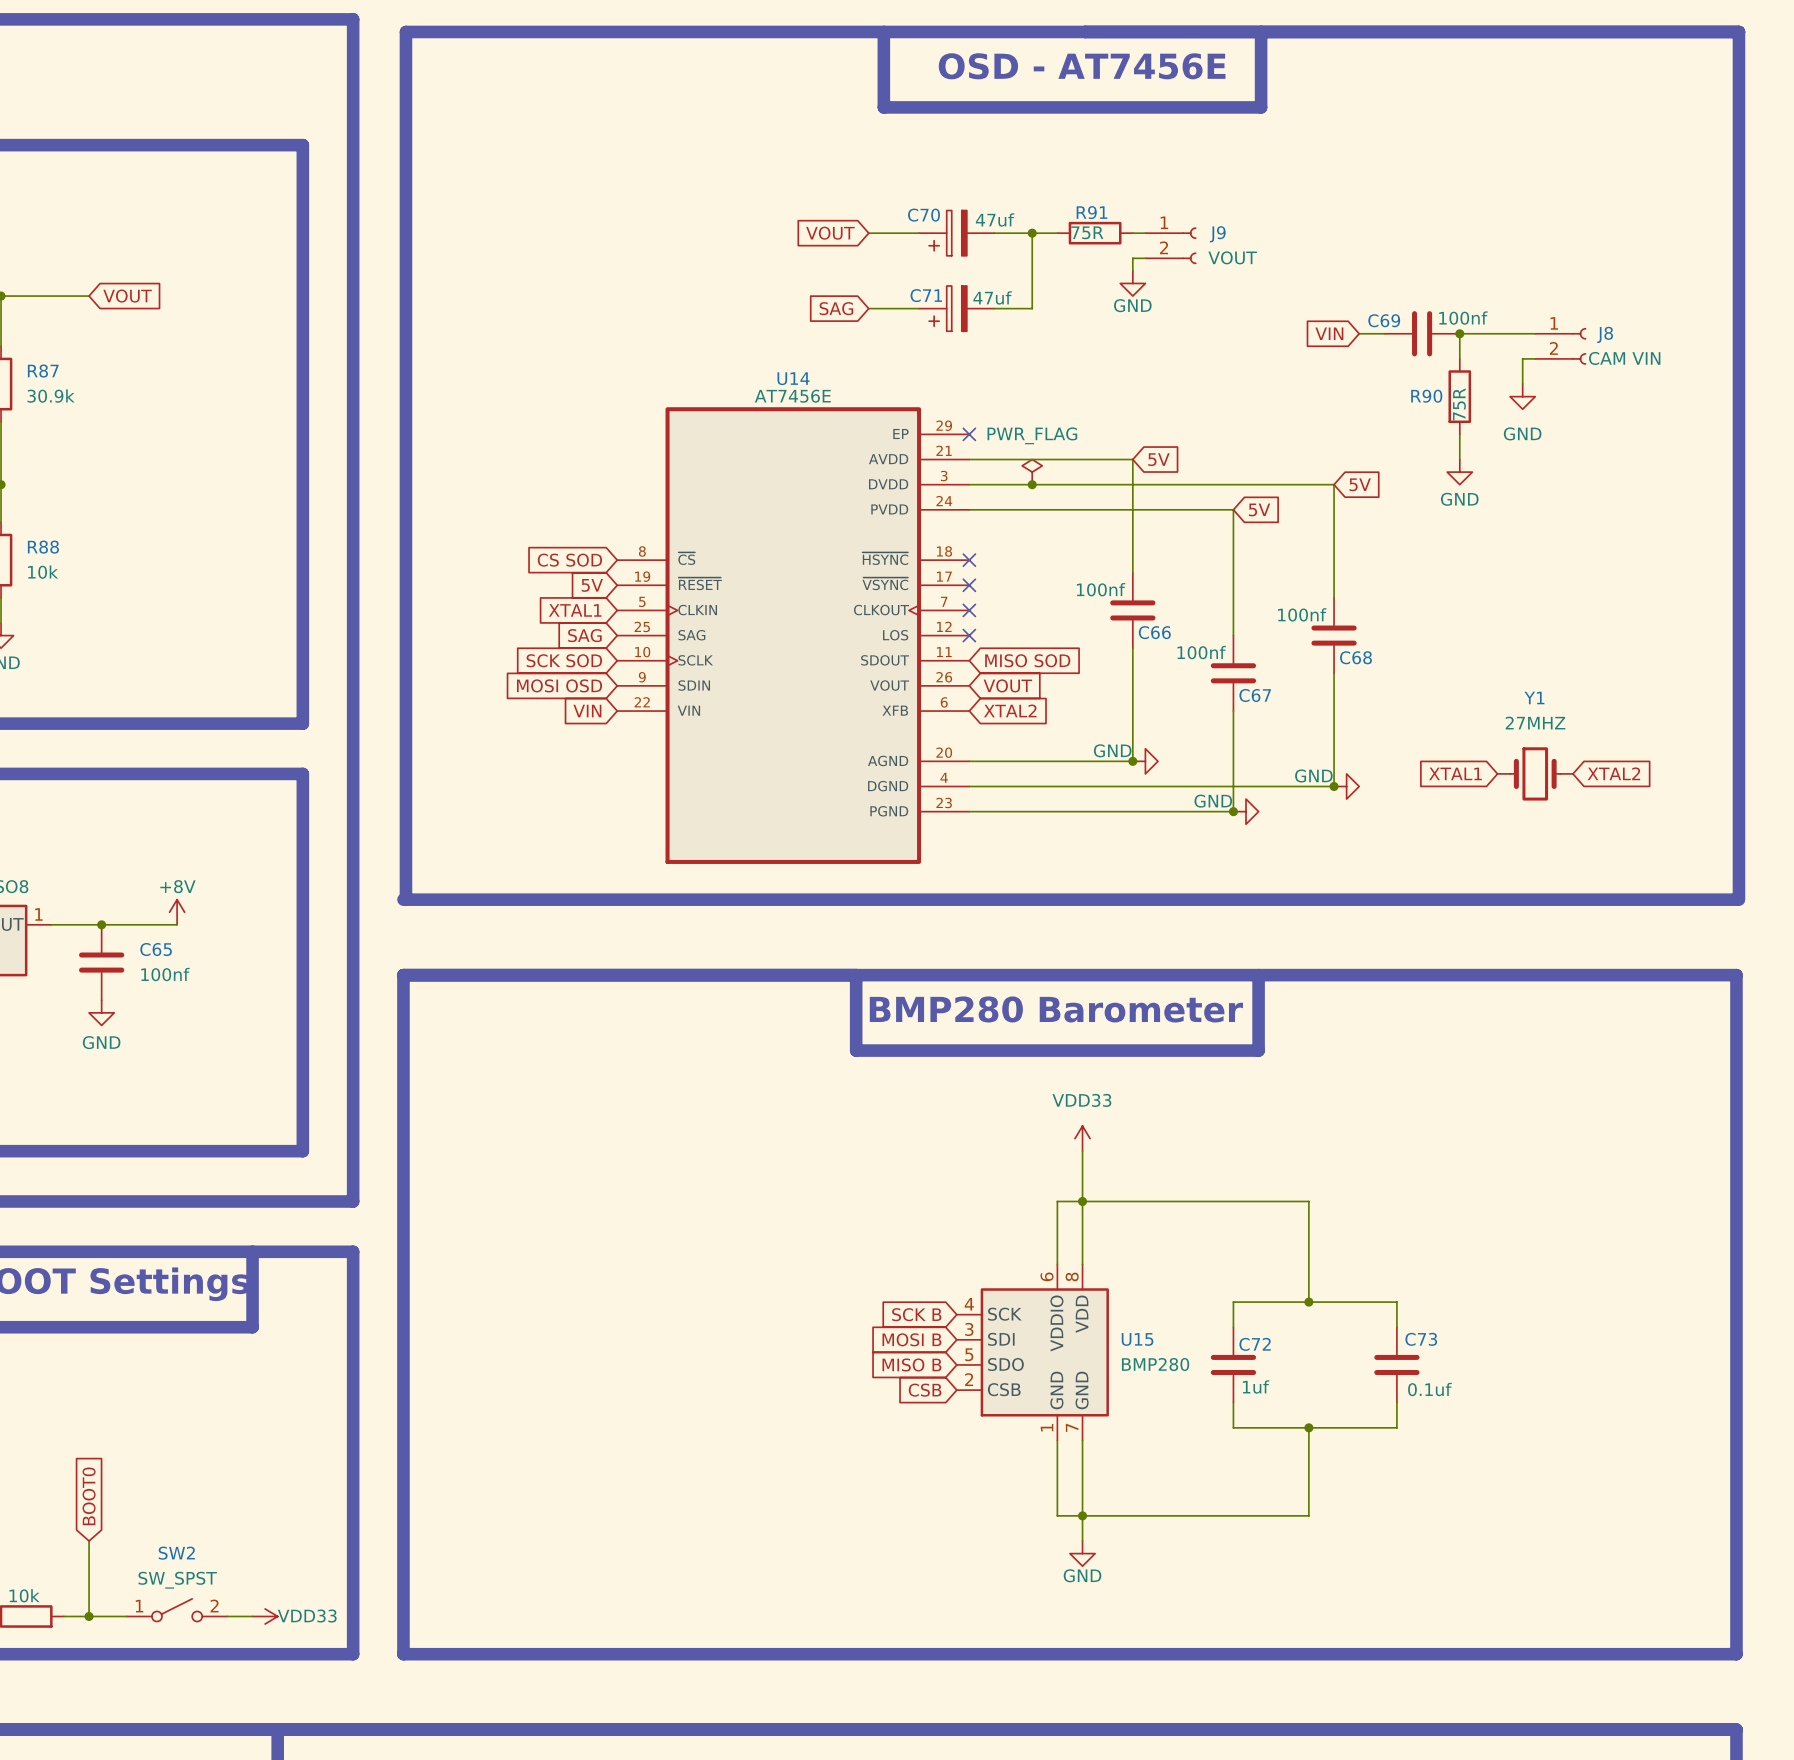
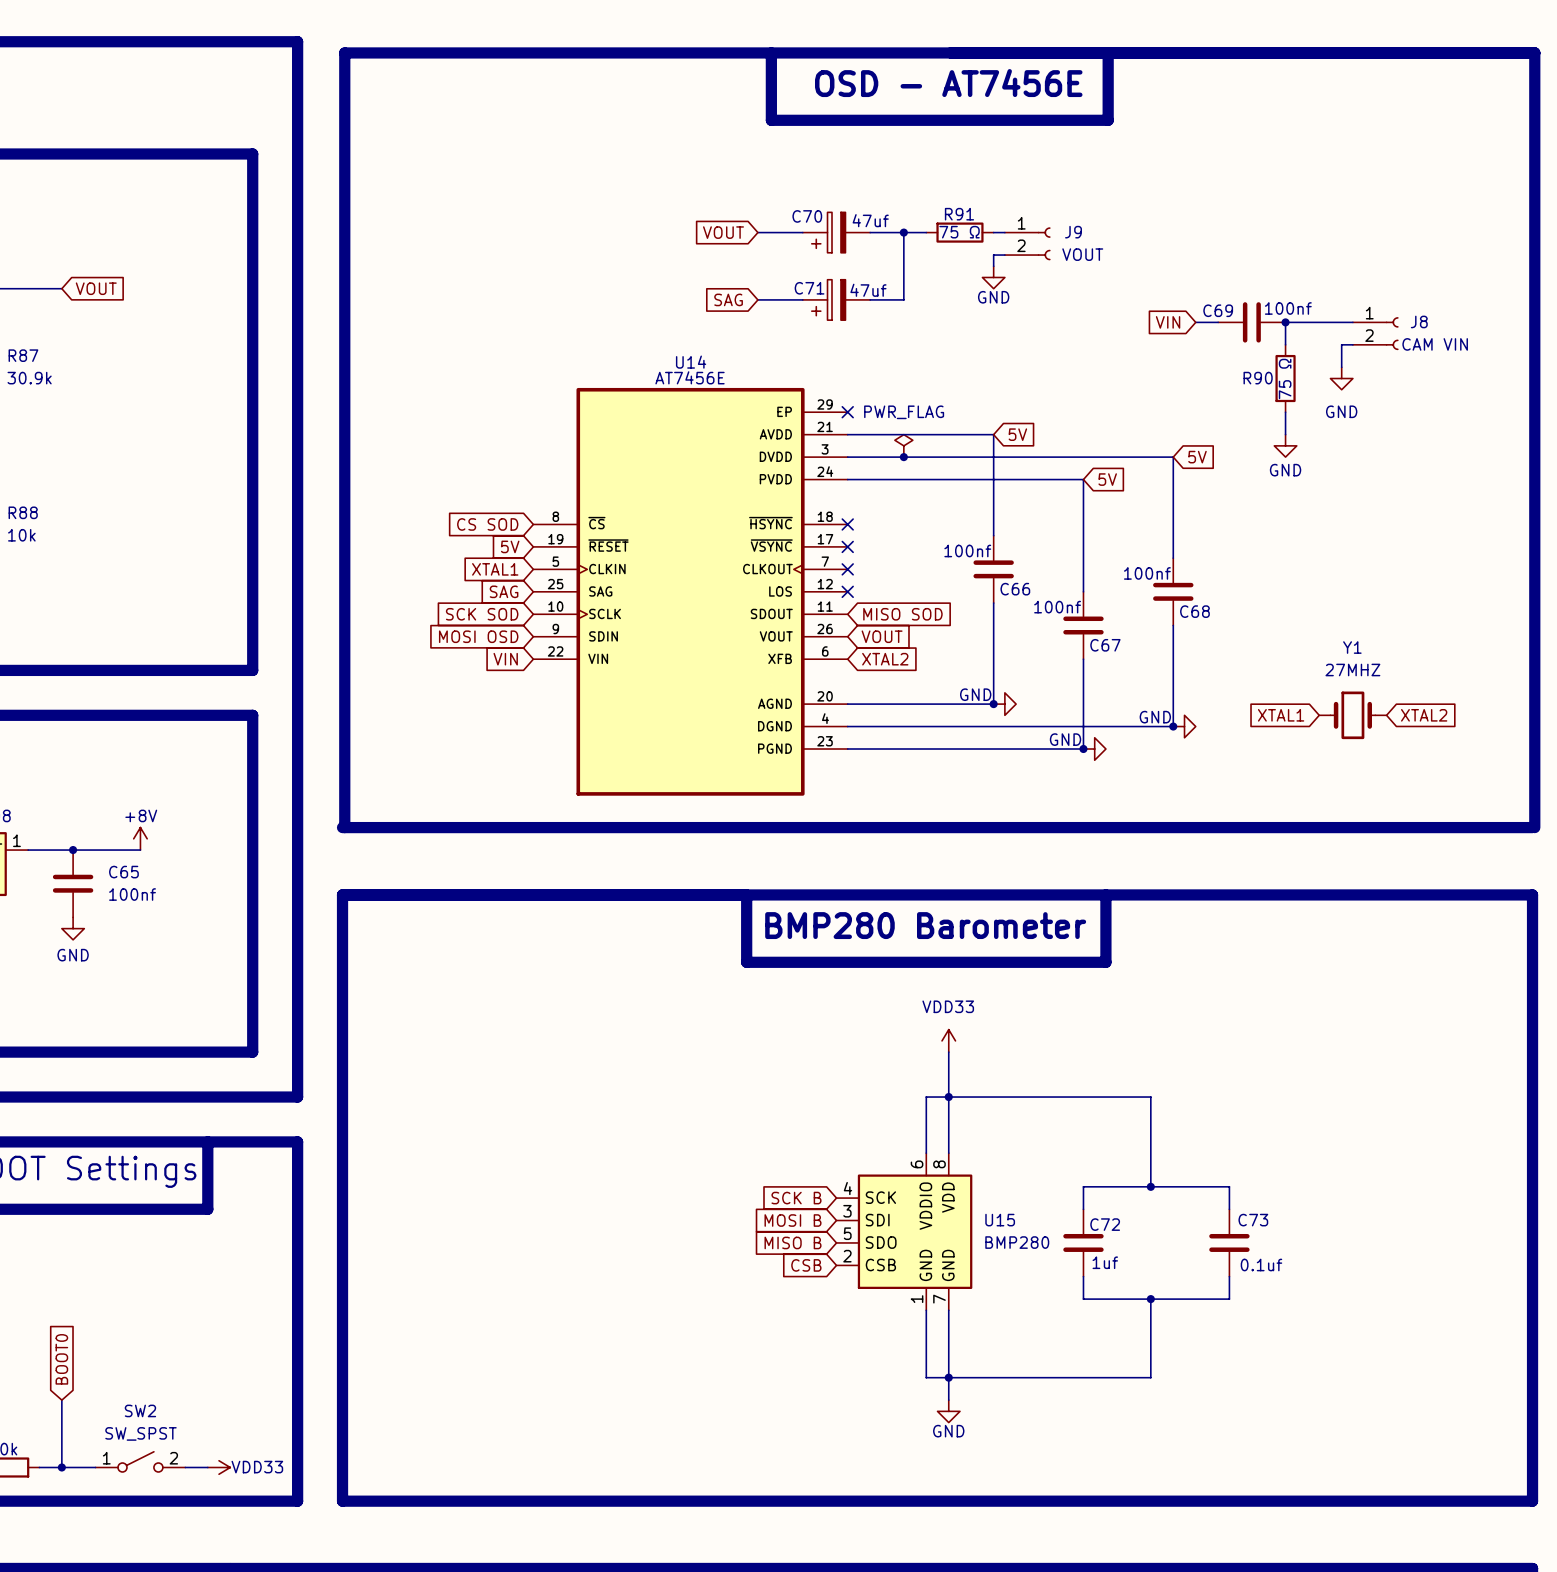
R91 value: 75R (1087, 232) -> 75 Ω (959, 232)
R90 value: 75R (1459, 404) -> 75 Ω (1285, 378)

